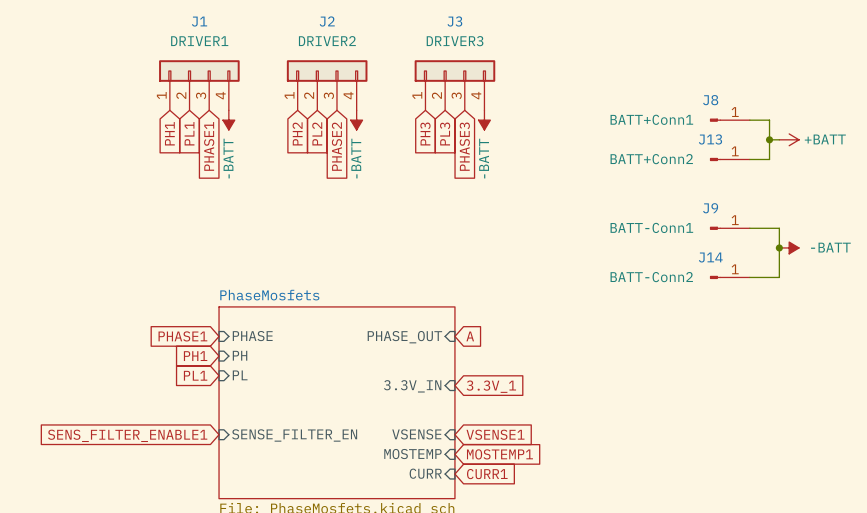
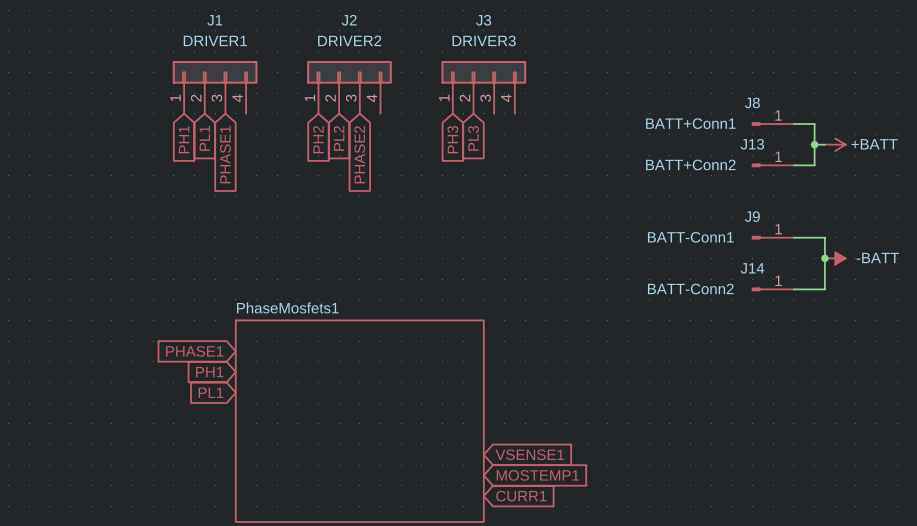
power symbol: -BATT (228, 120) -> none
power symbol: -BATT (356, 120) -> none
power symbol: -BATT (484, 120) -> none
global label: PHASE3 (464, 146) -> none
sheet PhaseMosfets name: PhaseMosfets (269, 295) -> PhaseMosfets1 (287, 307)
sheet pin: PHASE (252, 336) -> none
global label: A (470, 336) -> none
sheet pin: PHASE_OUT (404, 337) -> none
sheet pin: PH (240, 355) -> none
sheet pin: PL (240, 375) -> none
sheet pin: 3.3V_IN (412, 386) -> none
global label: 3.3V_1 (491, 386) -> none
sheet pin: VSENSE (416, 434) -> none
global label: SENS_FILTER_ENABLE1 (127, 435) -> none
sheet pin: SENSE_FILTER_EN (294, 435) -> none
sheet pin: MOSTEMP (412, 454) -> none
sheet pin: CURR (425, 473) -> none

